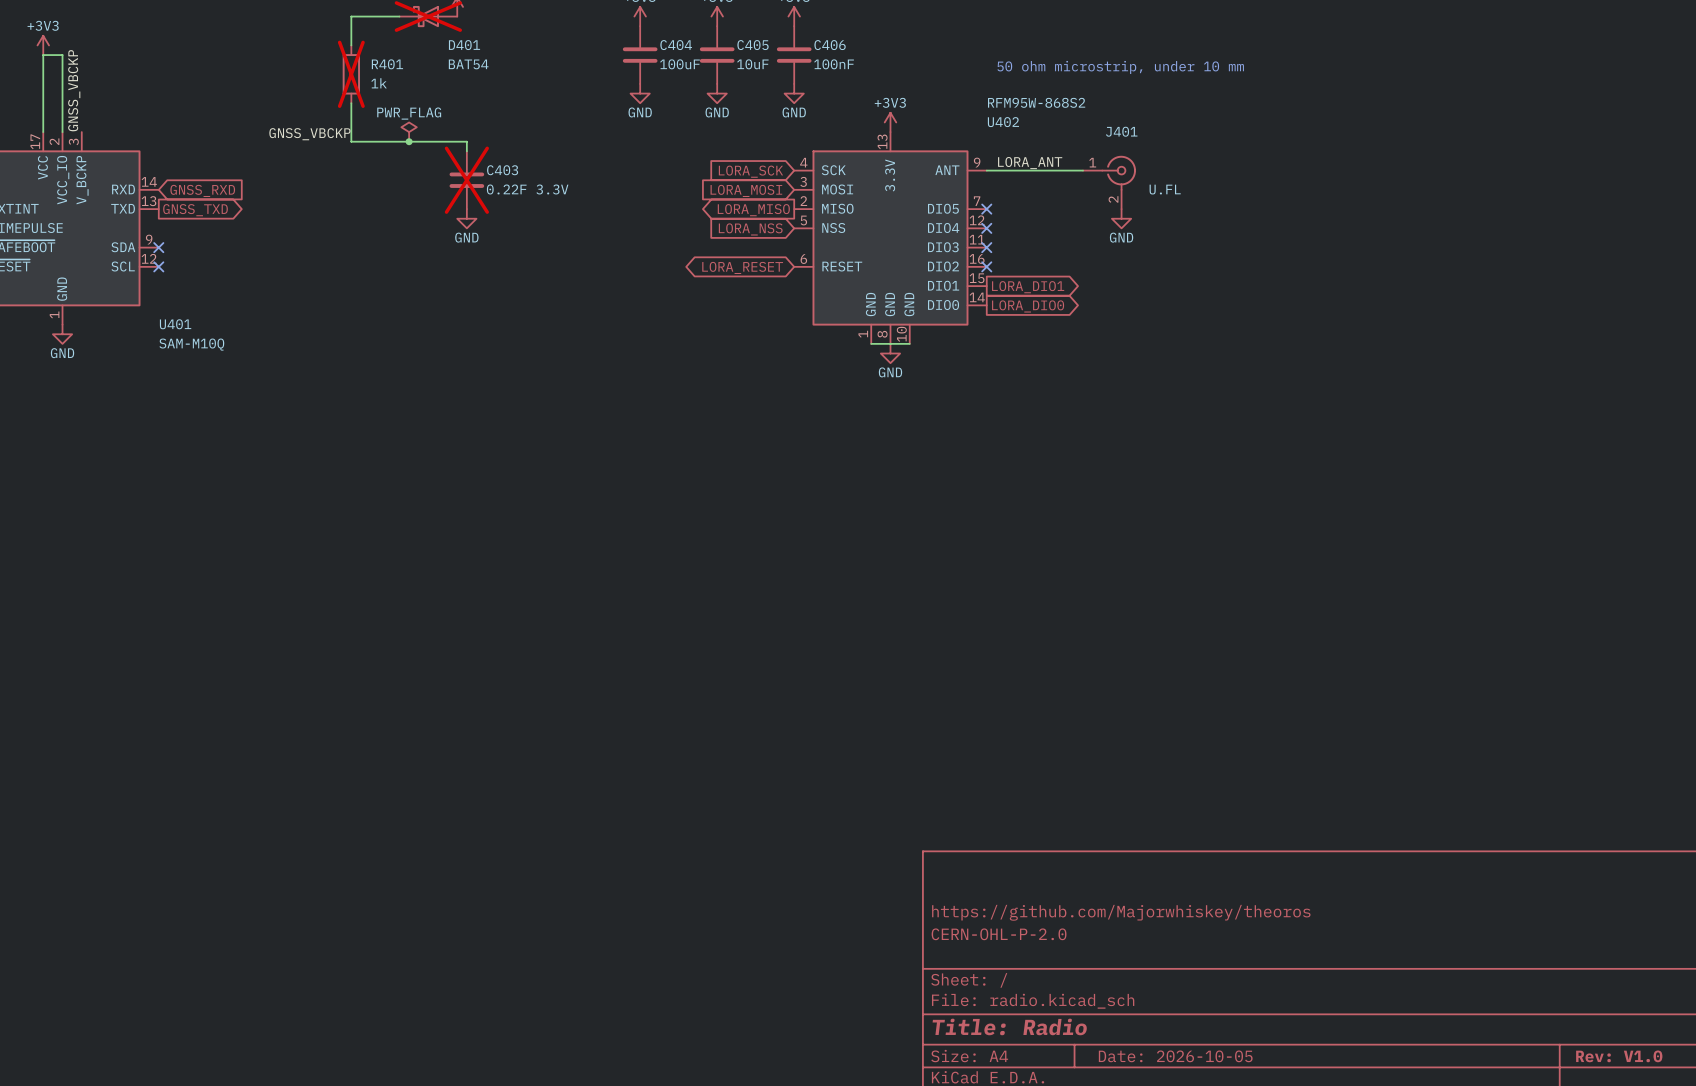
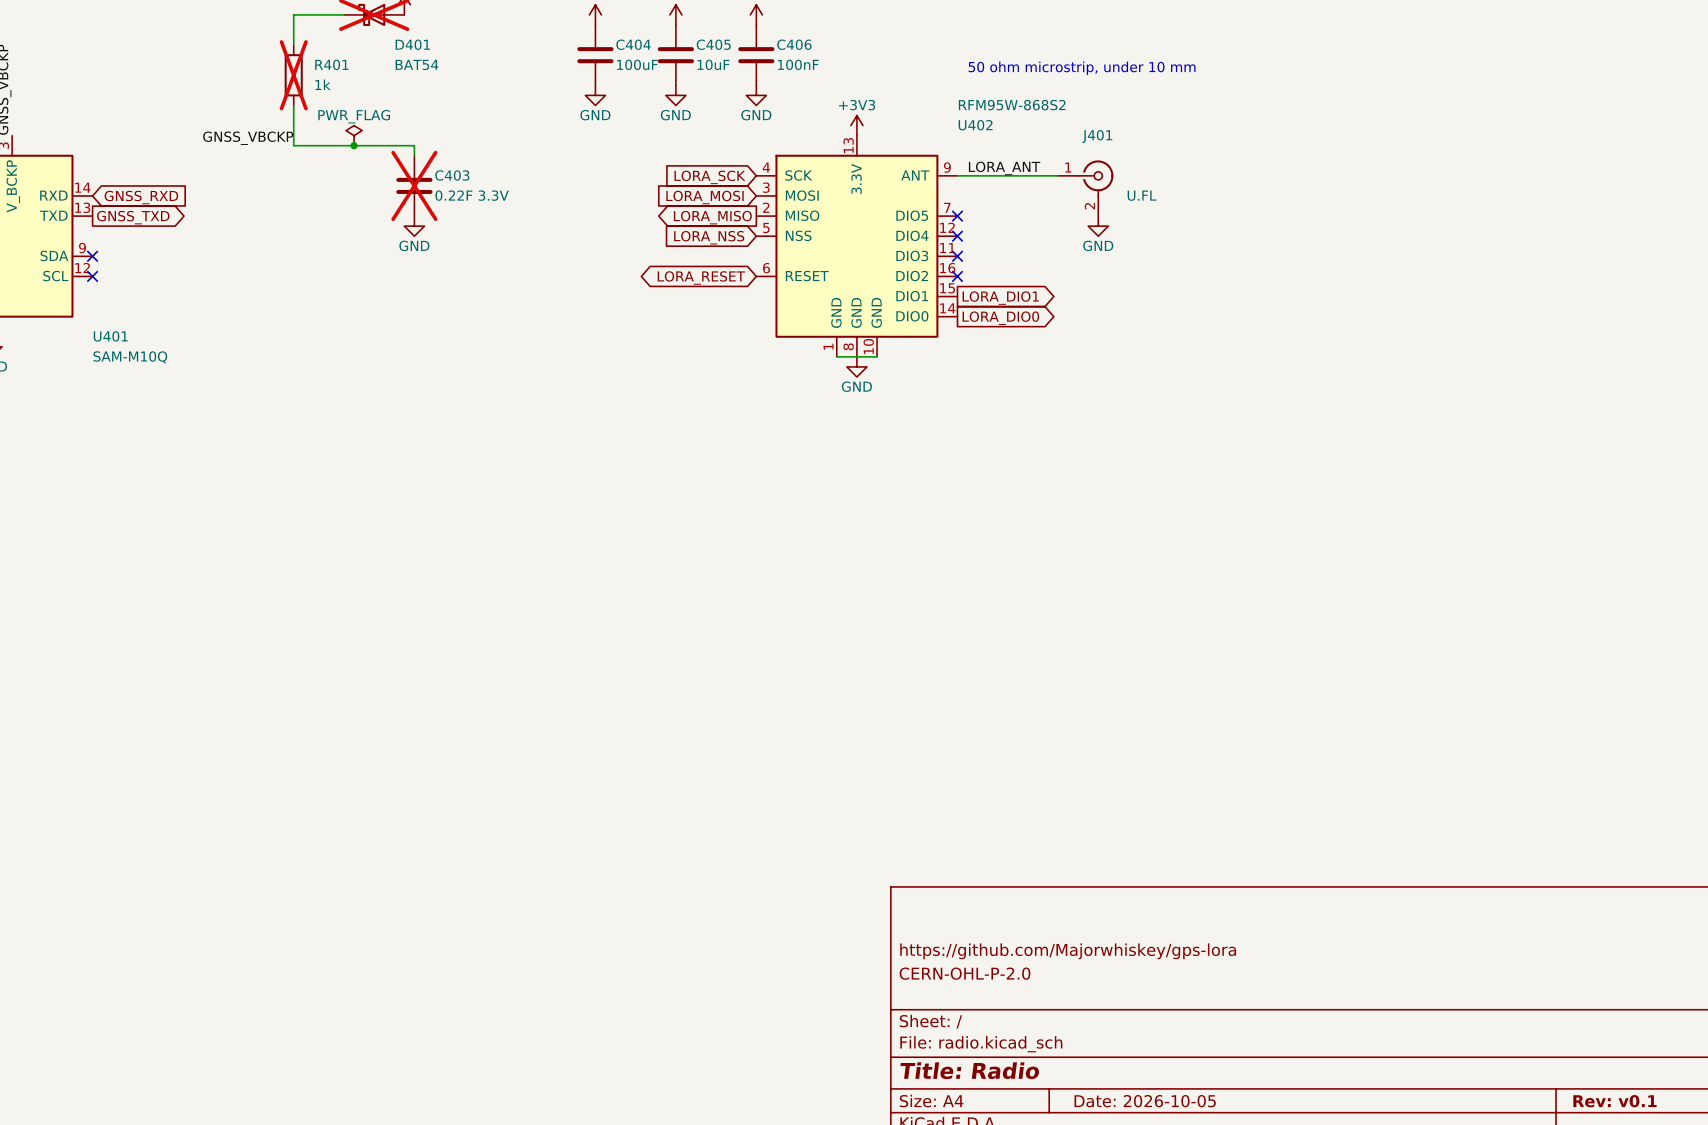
title block: https://github.com/Majorwhiskey/theoros (1121, 912) -> https://github.com/Majorwhiskey/gps-lora (1068, 951)
title block: Rev: V1.0 (1619, 1056) -> Rev: v0.1 (1614, 1101)

